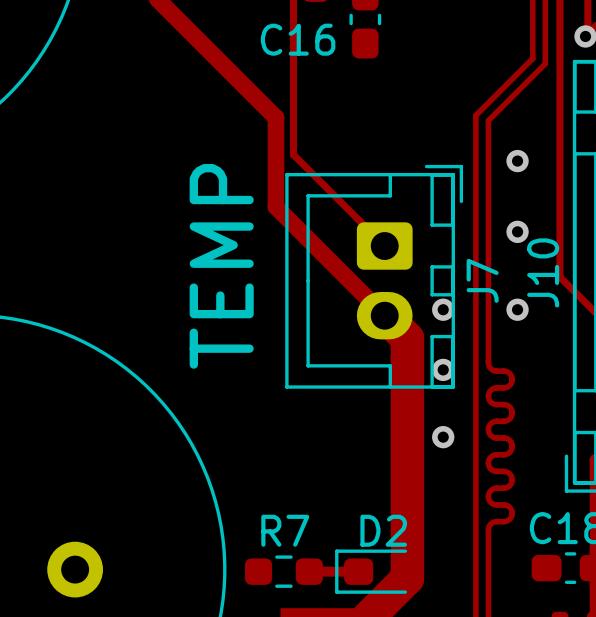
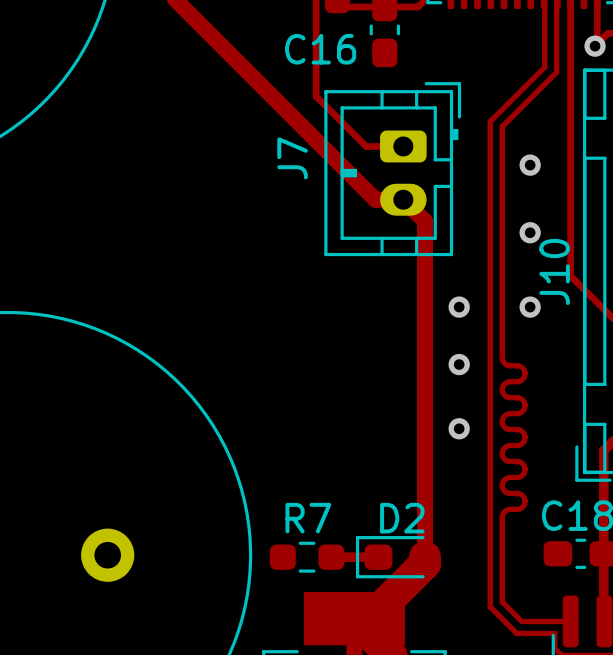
track: (293, 89) (293, 154) (384, 246) -> (316, 96) (366, 146) (403, 146)
track: (275, 117) (275, 206) (407, 338) -> (299, 123) (375, 199) (403, 199) (425, 221) (425, 334)
J7 footprint: [285, 164, 464, 389] -> [324, 82, 462, 257]
text: TEMP (221, 266) -> none
J7 name position: J7 (482, 280) -> J7 (292, 158)
track width: thick (407, 338) (407, 571) -> thin (425, 334) (425, 557)

